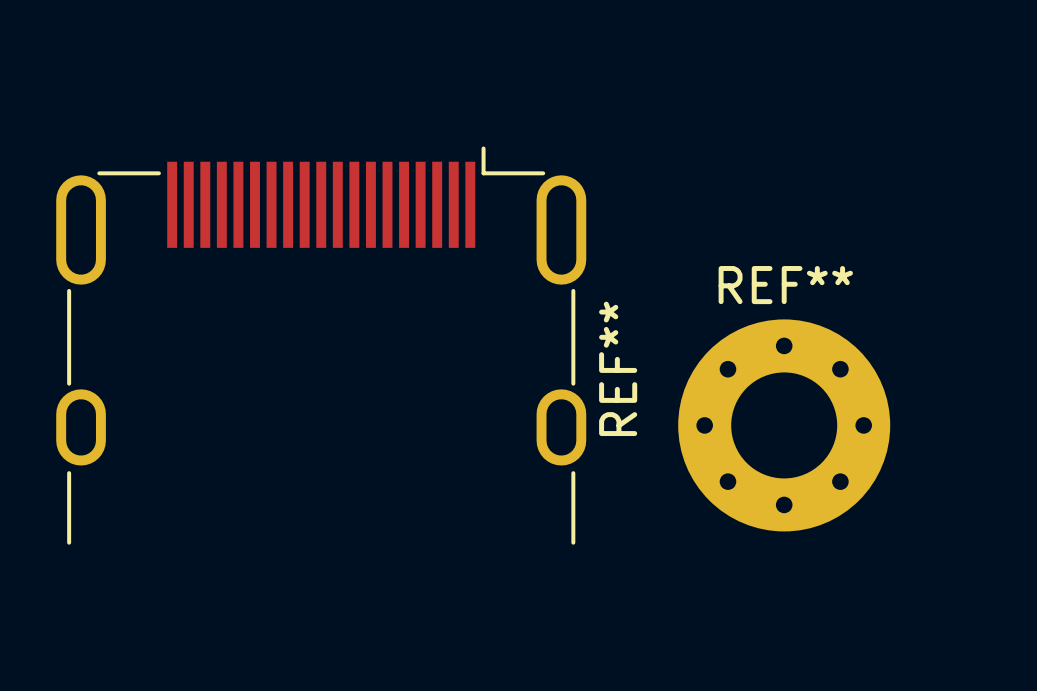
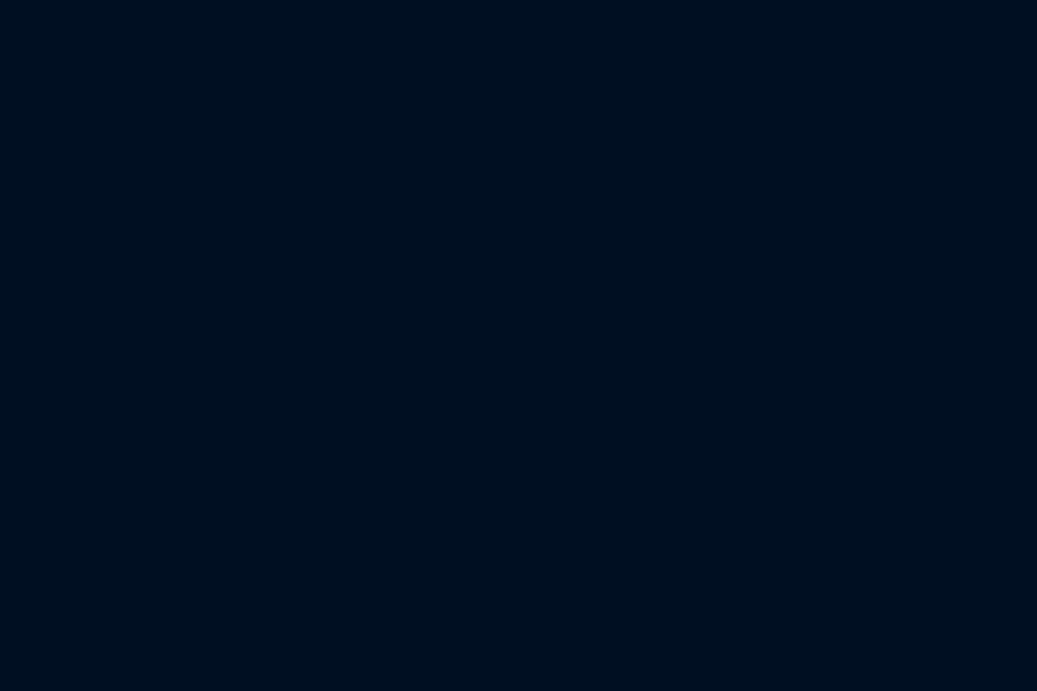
REF**: (321, 345) -> none
REF**: (784, 425) -> none

